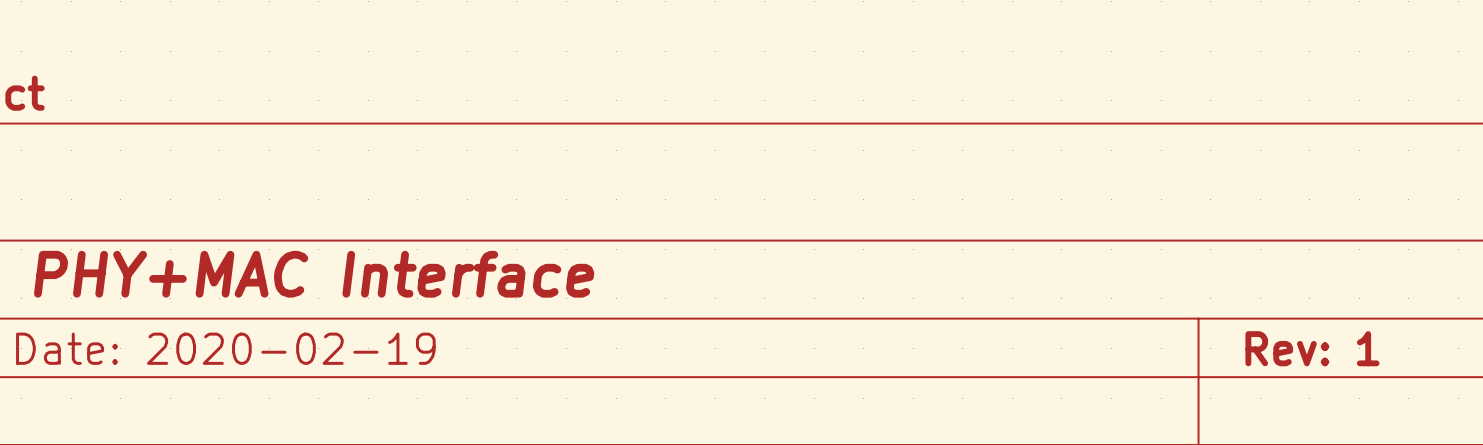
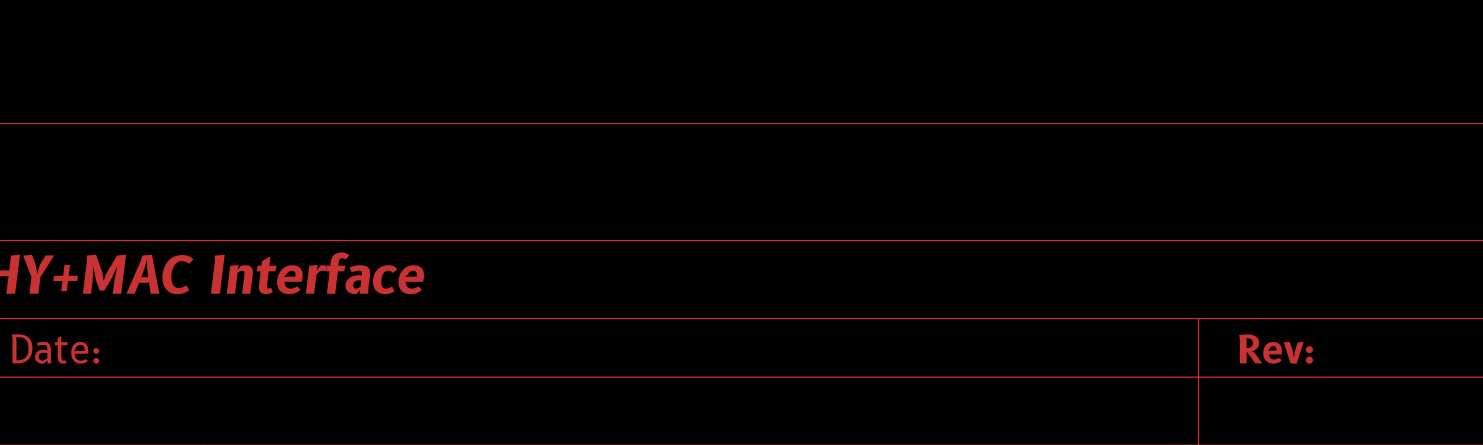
title block: Date: 2020-02-19 (225, 348) -> Date: (55, 348)
title block: Rev: 1 (1312, 348) -> Rev: (1276, 349)

